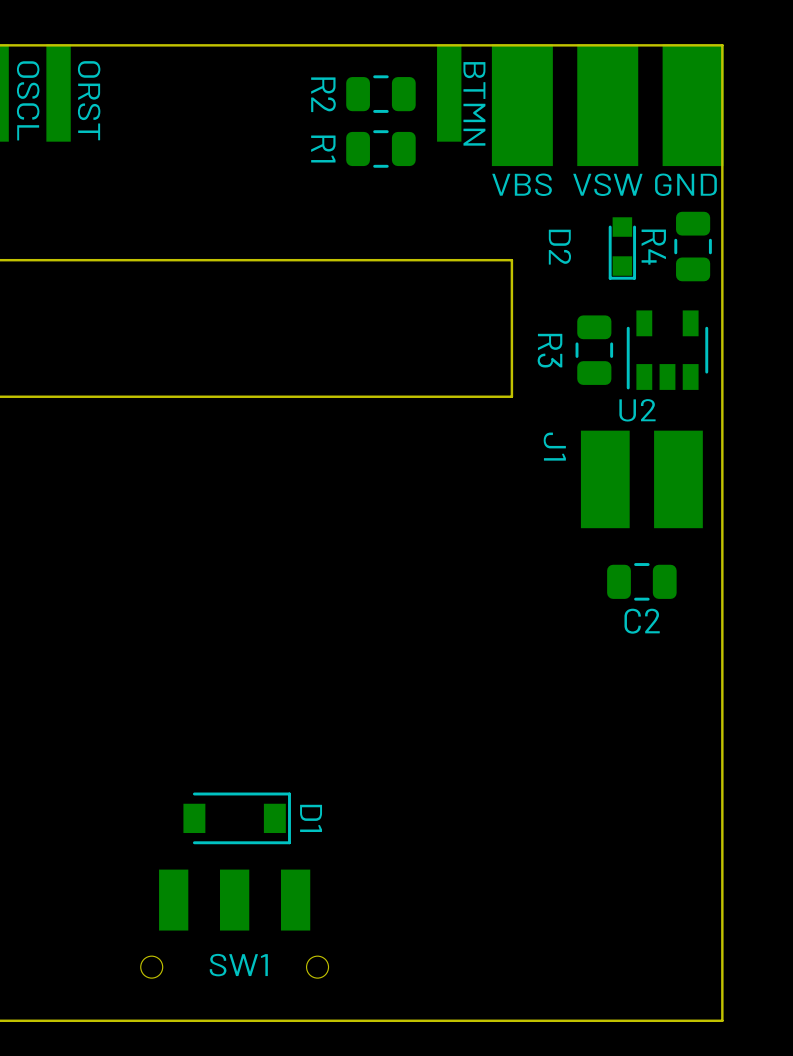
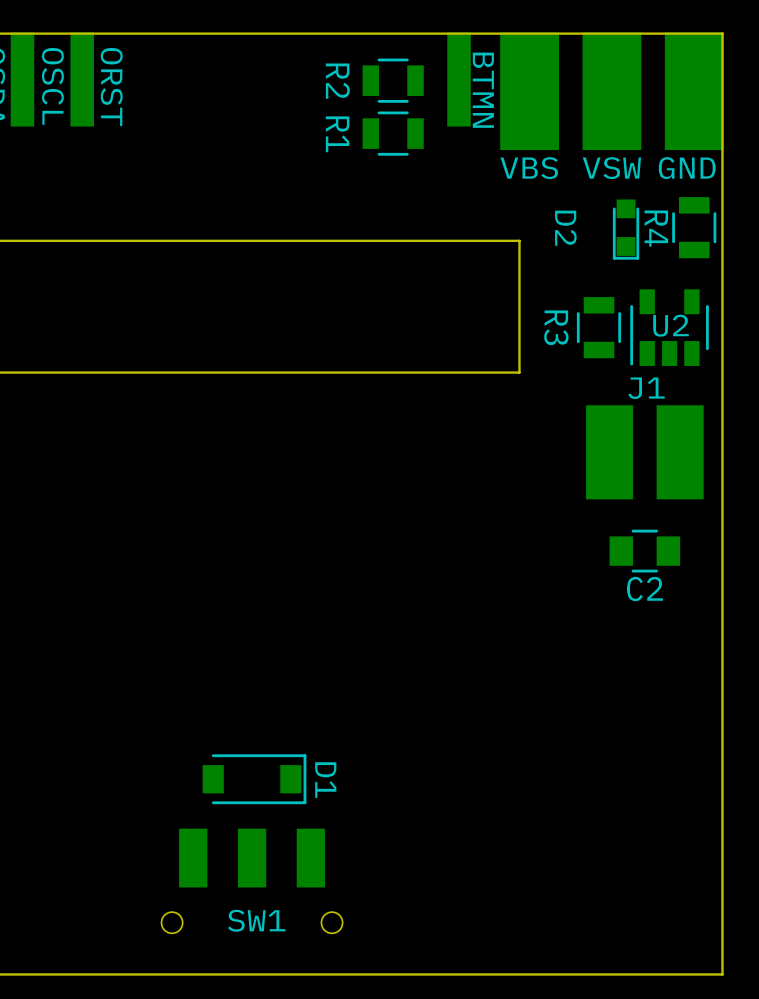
R2 footprint: [346, 75, 416, 113] -> [362, 58, 424, 103]
R1 footprint: [346, 130, 416, 168] -> [362, 111, 424, 156]
R4 footprint: [674, 211, 712, 282] -> [672, 197, 717, 259]
R3 footprint: [575, 315, 614, 385] -> [576, 297, 622, 359]
U2 name position: U2 (637, 410) -> U2 (671, 325)
J1 name rotation: 0° (554, 446) -> 90° counterclockwise (646, 388)
J1 name position: J1 (554, 446) -> J1 (646, 388)
C2 footprint: [607, 563, 677, 601] -> [609, 529, 681, 573]

